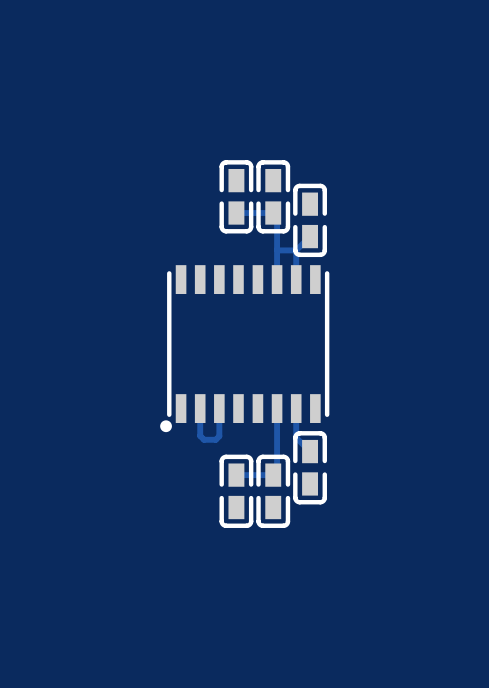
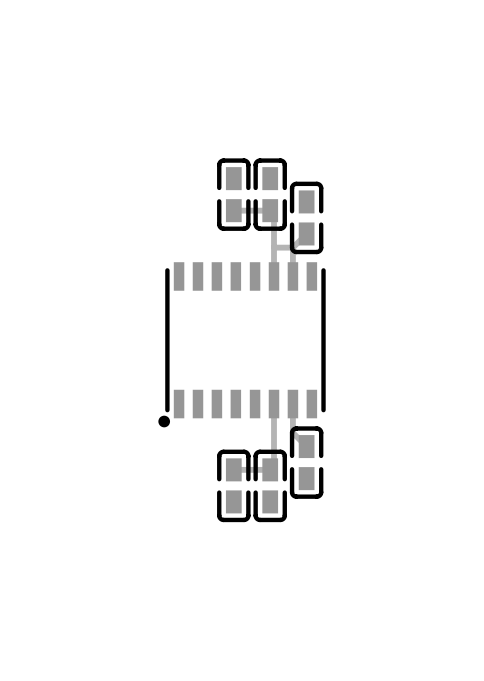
track: (200, 408) (200, 435) (204, 439) (215, 439) (219, 436) (219, 408) -> none

